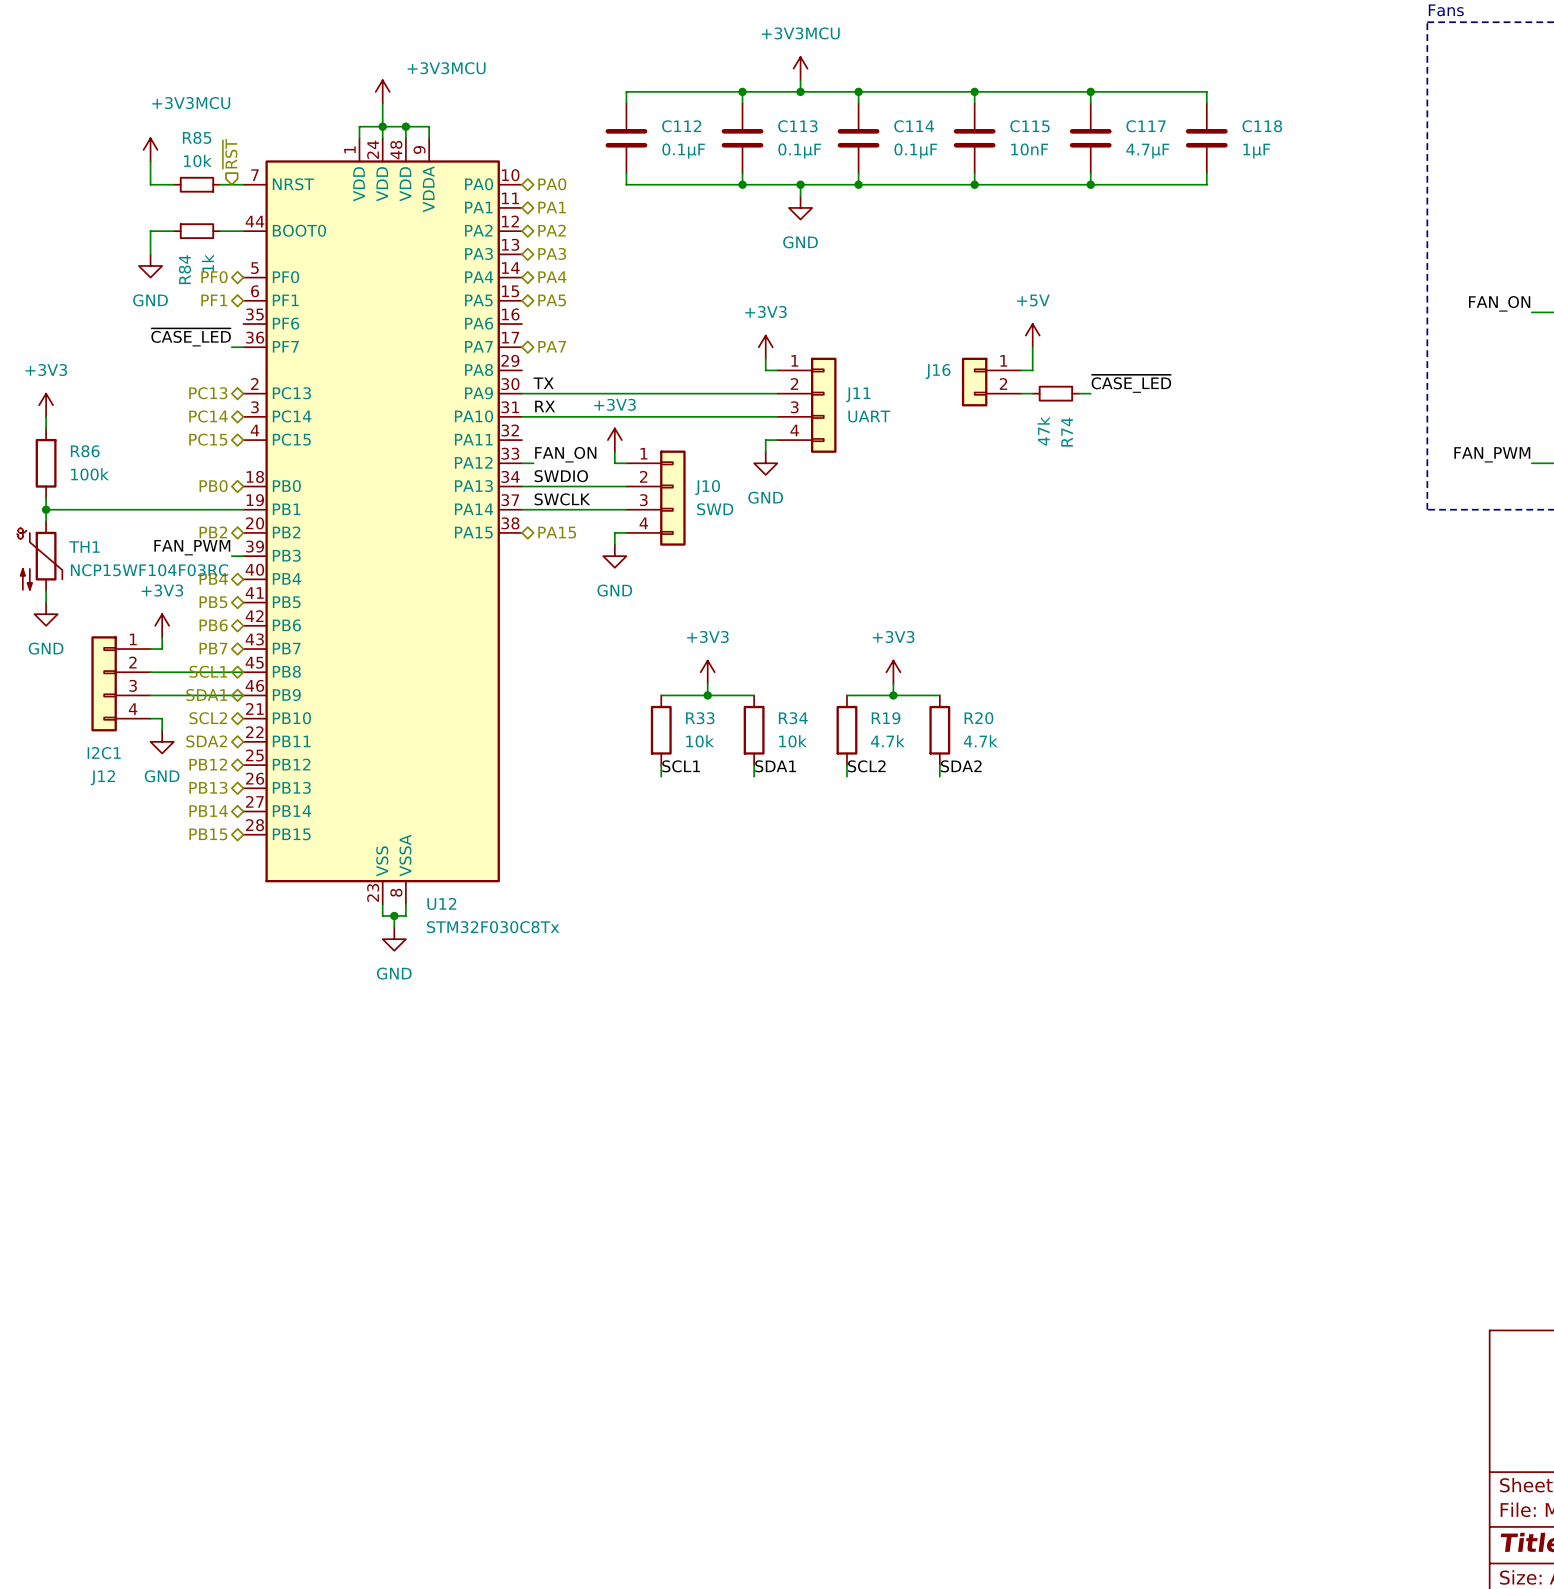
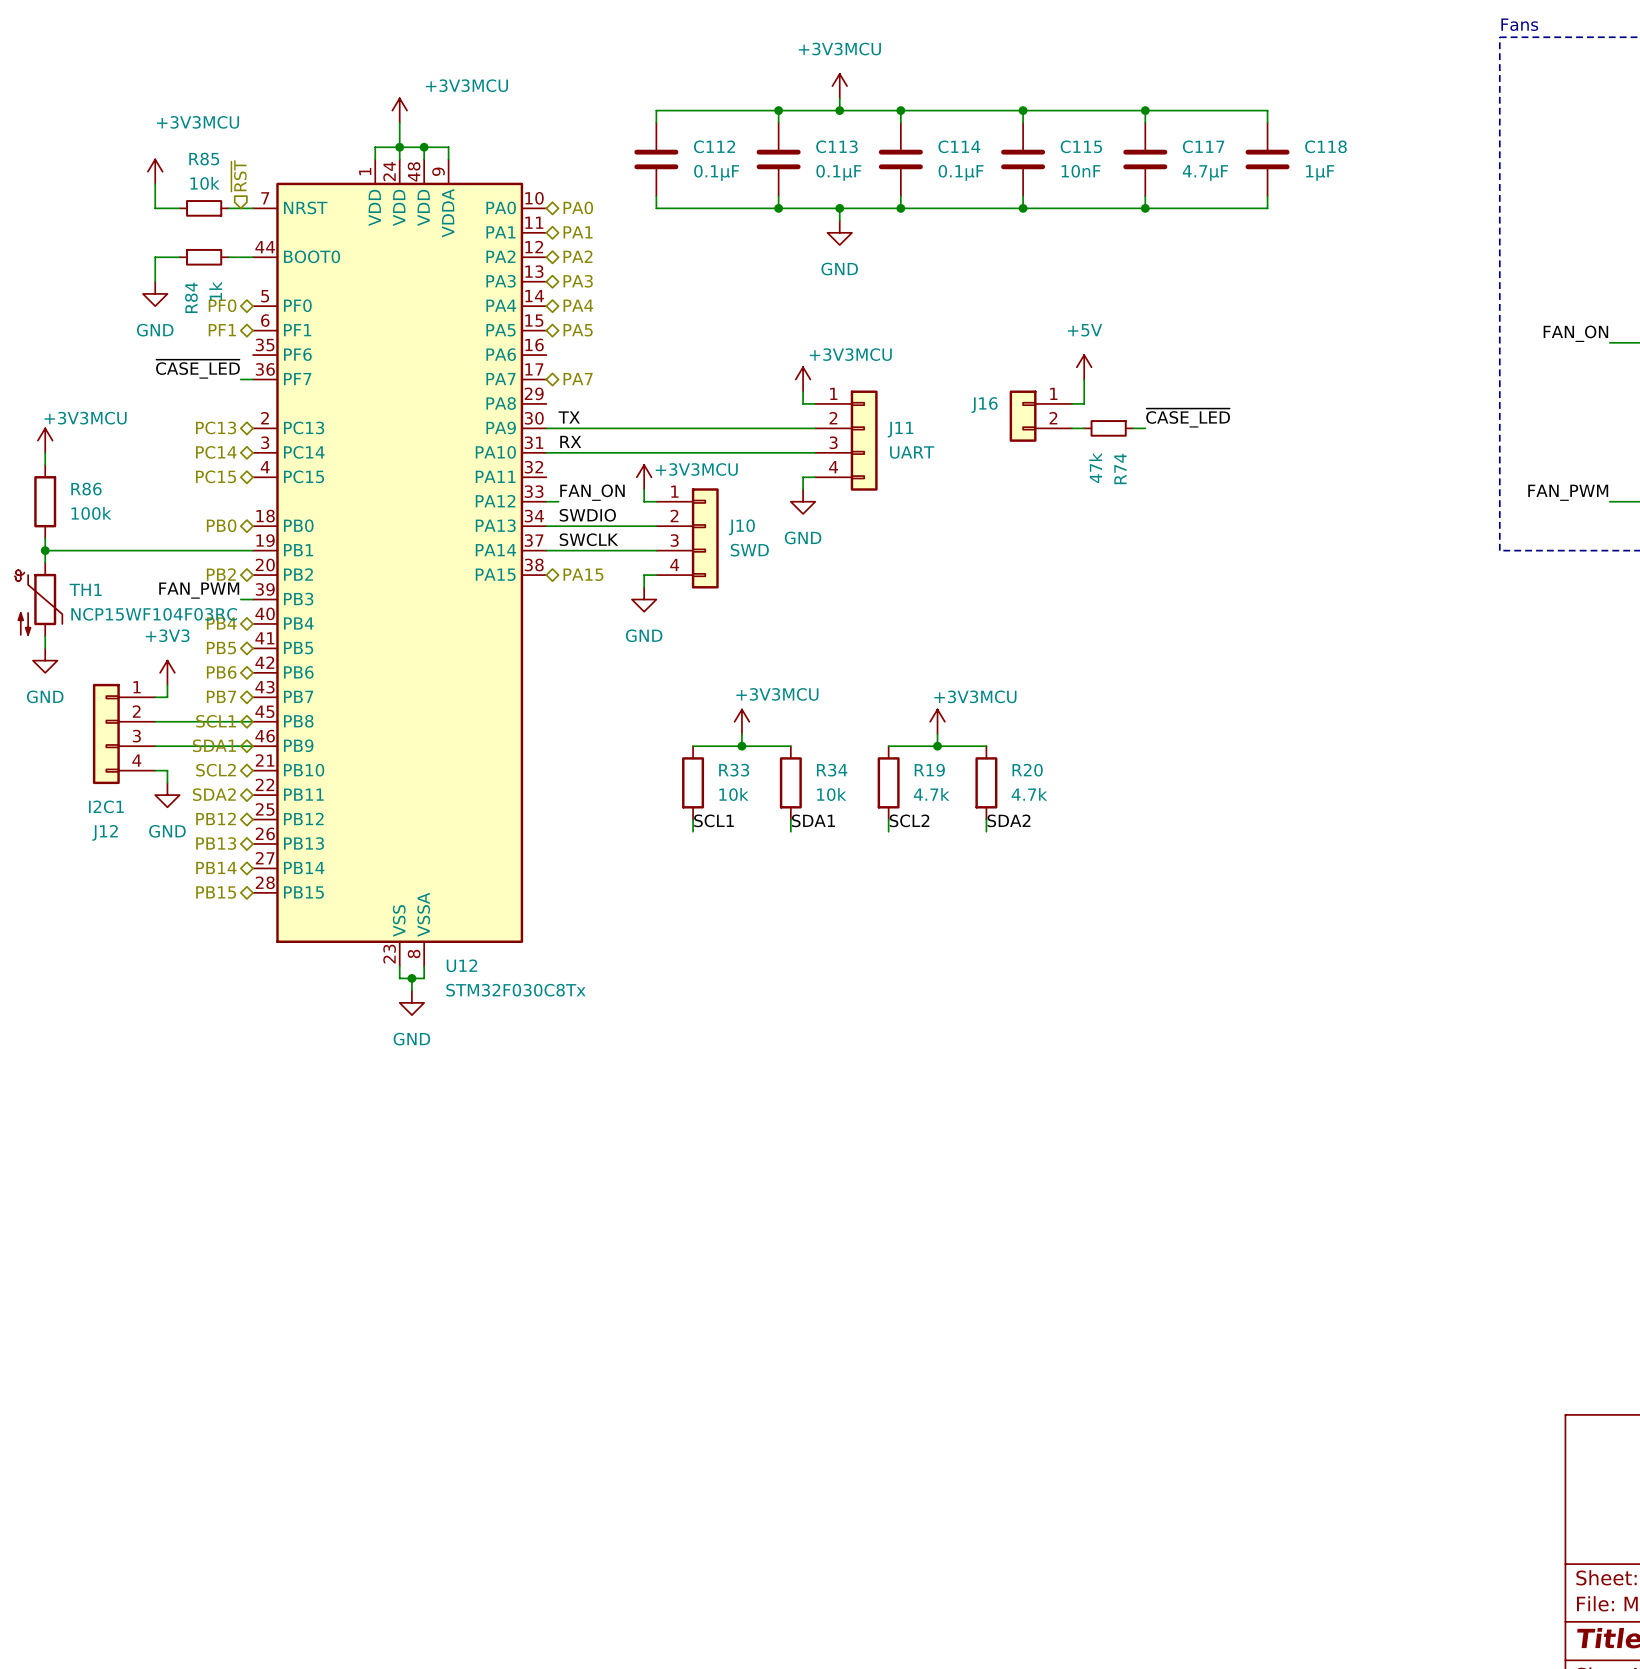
power symbol: +3V3 (765, 347) -> +3V3MCU (803, 379)
power symbol: +3V3 (46, 405) -> +3V3MCU (45, 440)
power symbol: +3V3 (614, 440) -> +3V3MCU (644, 477)
power symbol: +3V3 (707, 672) -> +3V3MCU (741, 721)
power symbol: +3V3 (893, 672) -> +3V3MCU (937, 721)

